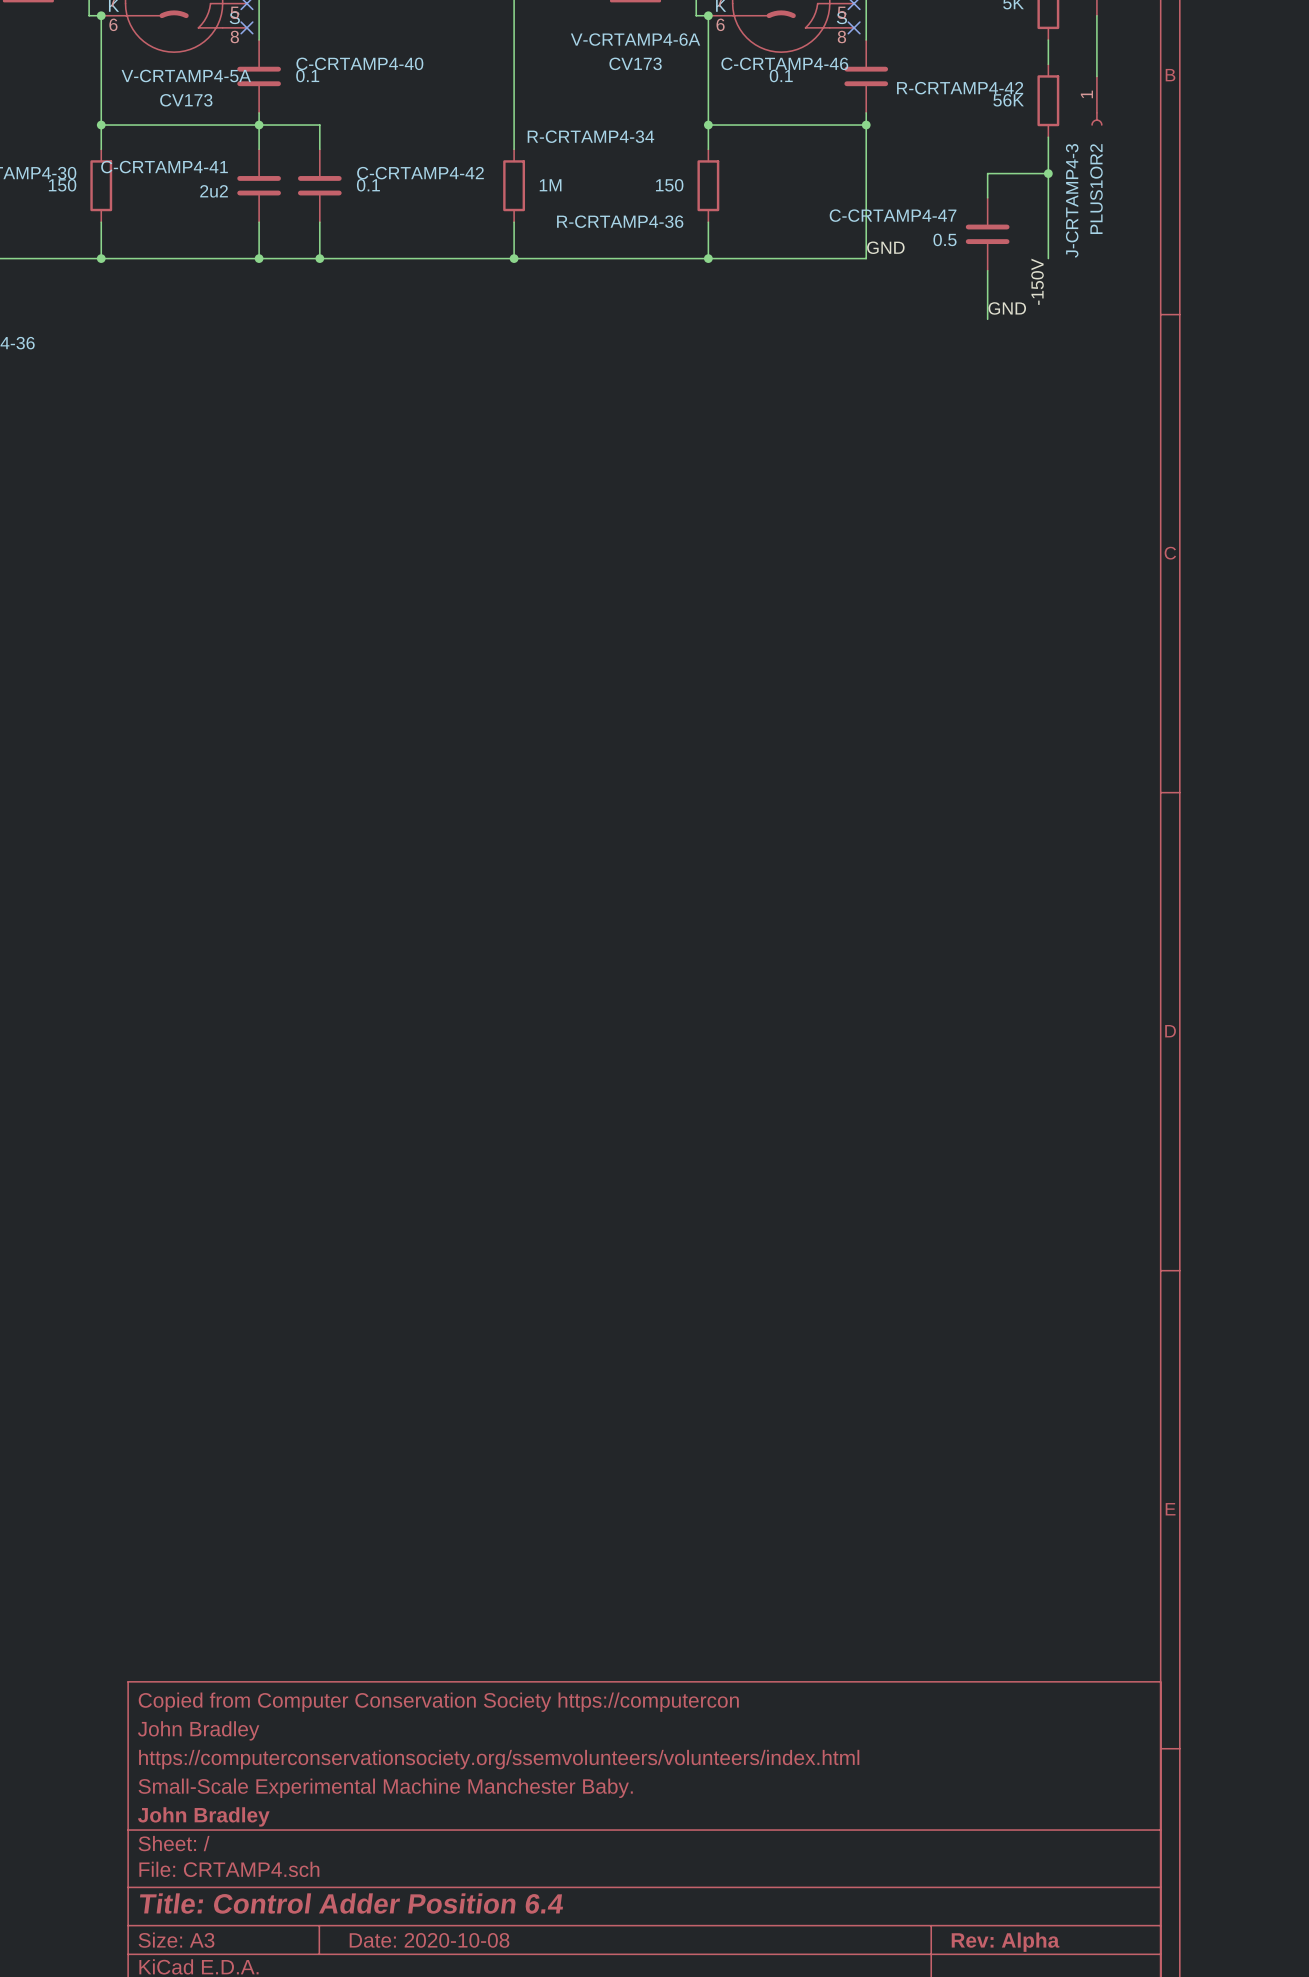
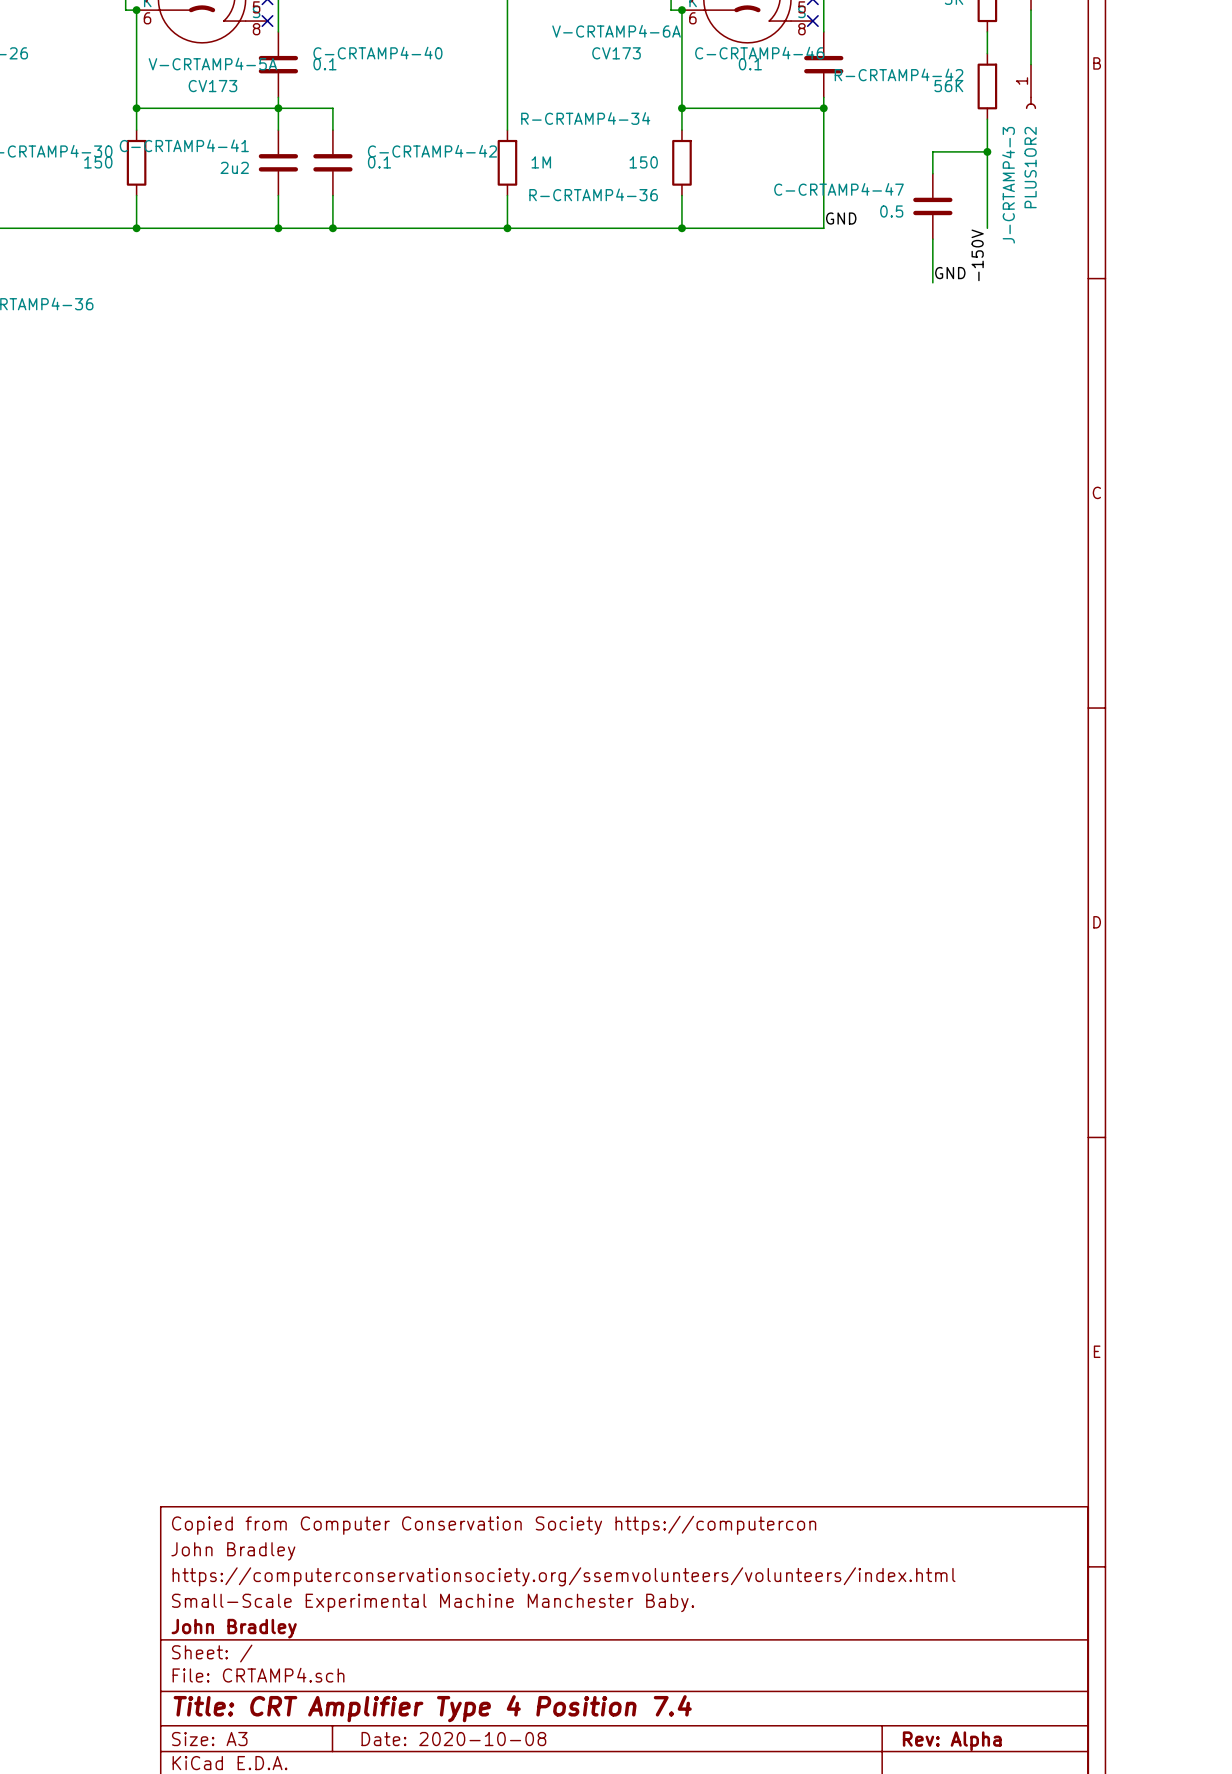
title block: Title: Control Adder Position 6.4 (351, 1903) -> Title: CRT Amplifier Type 4 Position 7.4 (432, 1708)

